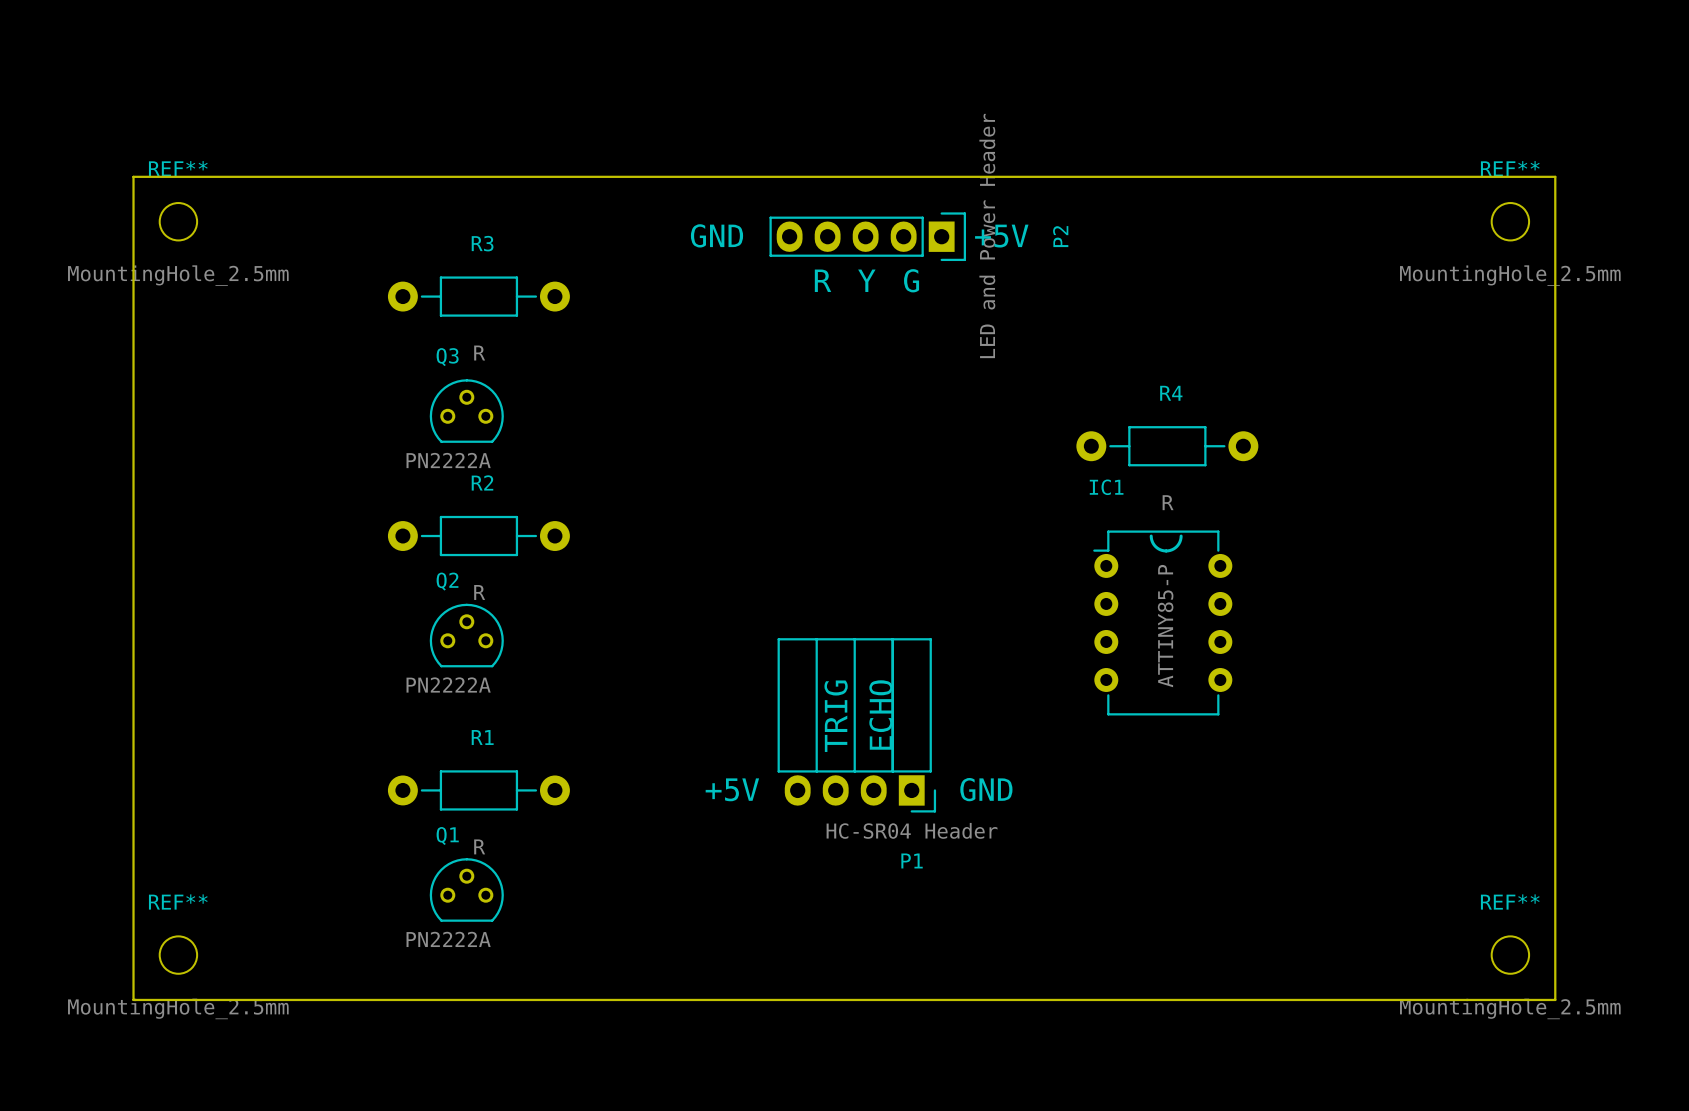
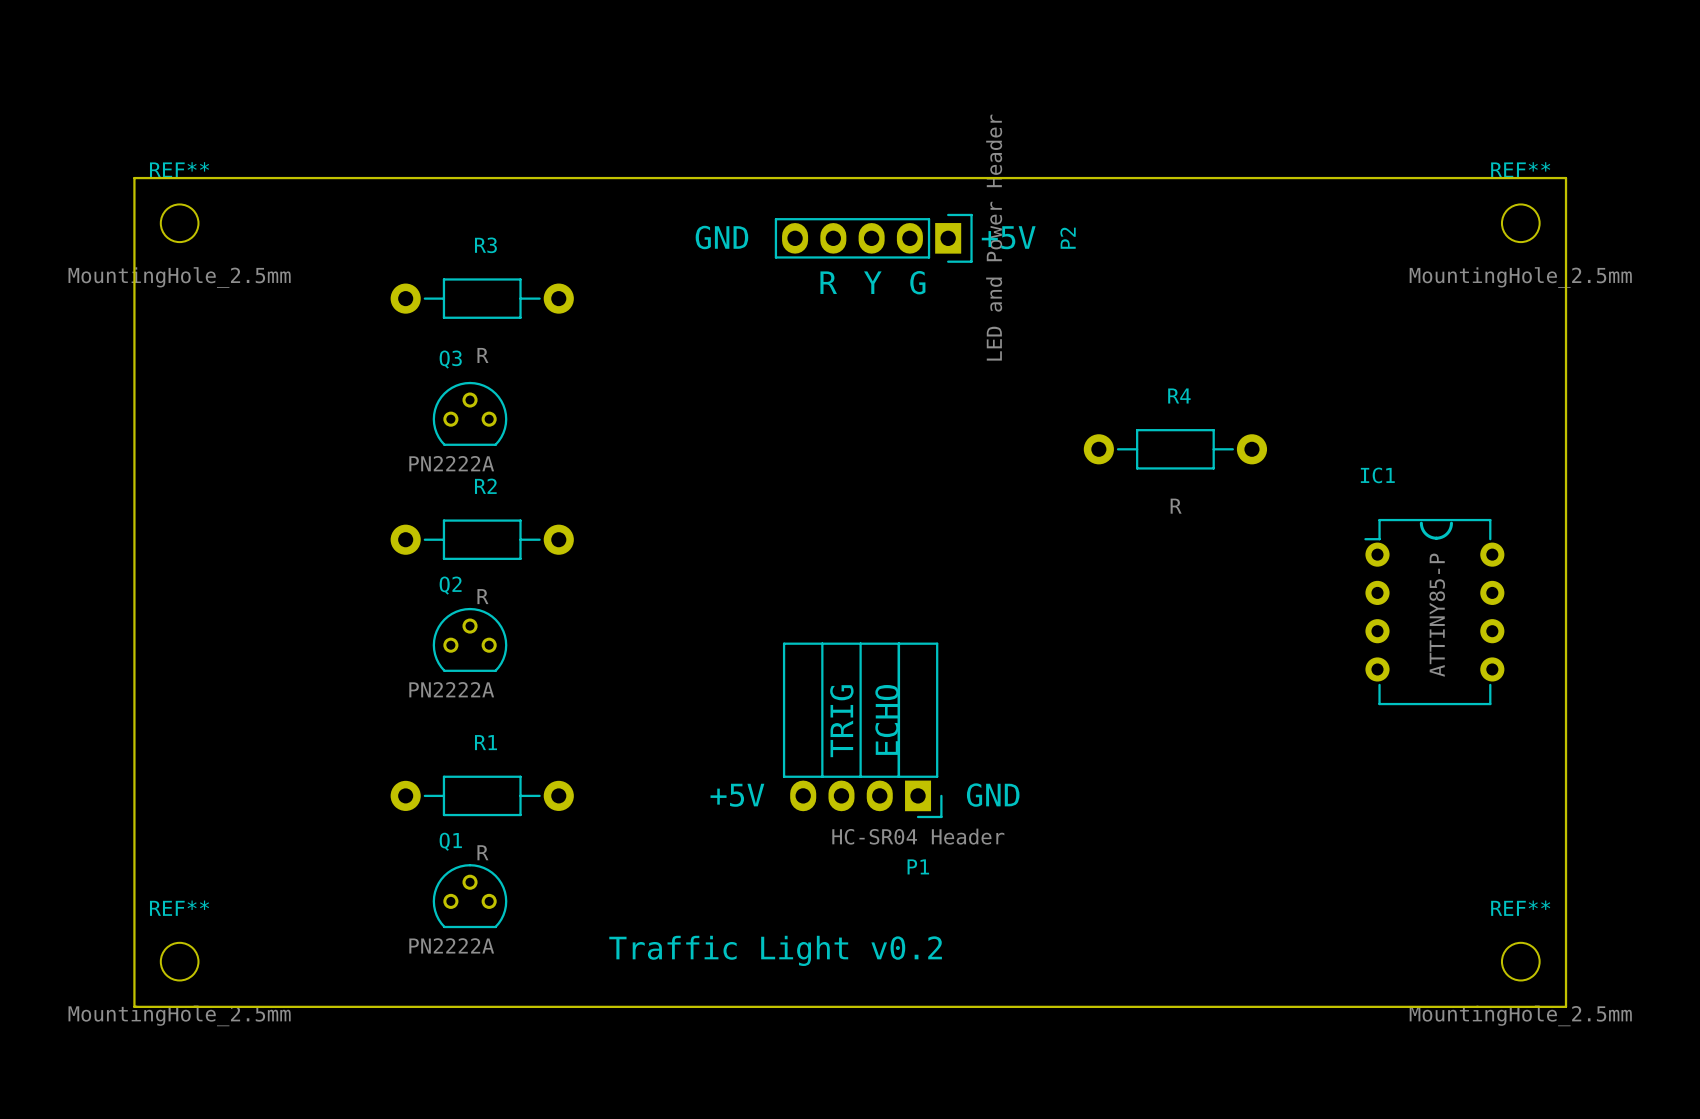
line: (1151, 536) (1155, 546) (1166, 550) (1176, 546) (1181, 536) -> (1421, 523) (1425, 533) (1436, 538) (1447, 533) (1451, 523)
IC1 position: (1162, 622) -> (1434, 612)
text: none -> Traffic Light v0.2 (775, 950)

